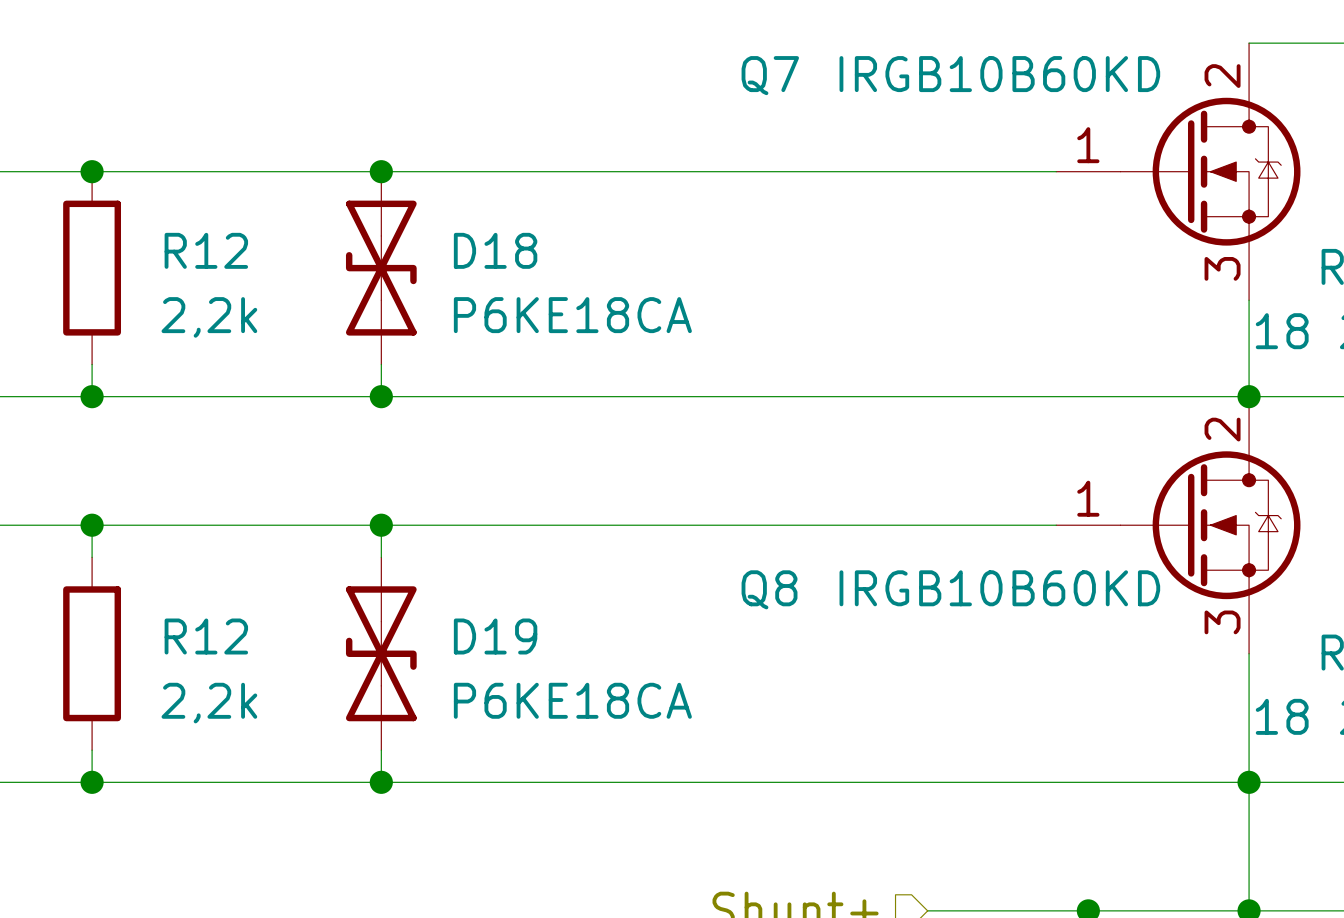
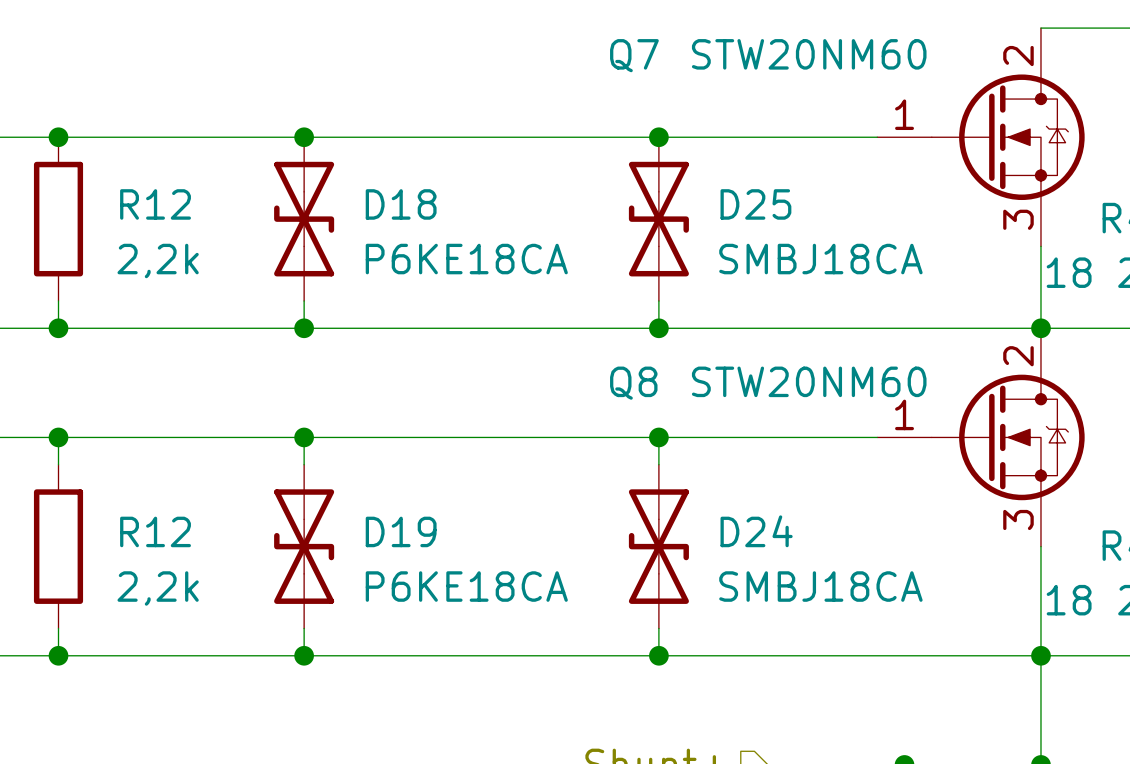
Q7 value: IRGB10B60KD (999, 74) -> STW20NM60 (809, 54)
junction: none -> (658, 137)
D25: none -> SMBJ18CA (658, 219)
wire: none -> (658, 300) (658, 328)
junction: none -> (658, 328)
wire: none -> (658, 437) (658, 464)
junction: none -> (658, 437)
Q8 value: IRGB10B60KD (999, 588) -> STW20NM60 (809, 381)
Q8 name position: Q8 (769, 589) -> Q8 (633, 383)
D24: none -> SMBJ18CA (658, 546)
wire: none -> (658, 628) (658, 655)
junction: none -> (658, 655)

